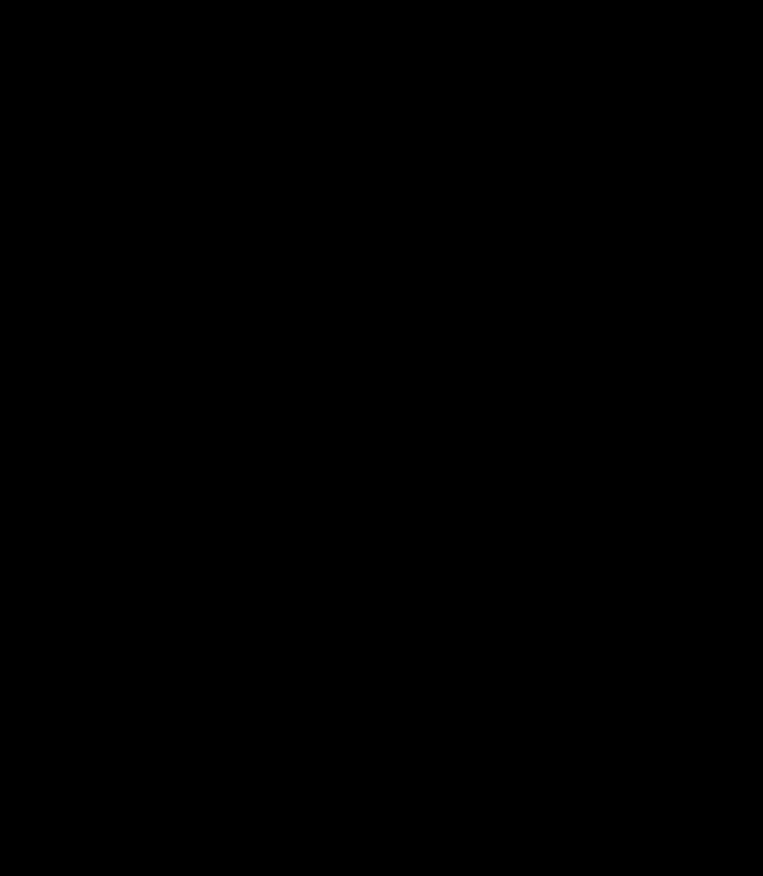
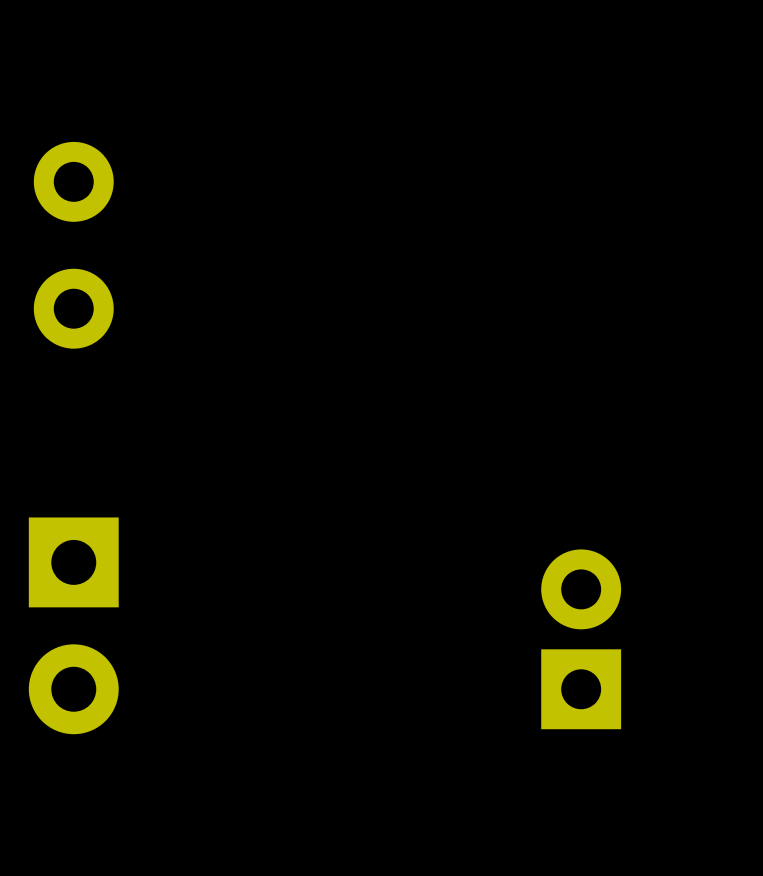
part: none -> (73, 245)
part: none -> (73, 625)
part: none -> (581, 639)

